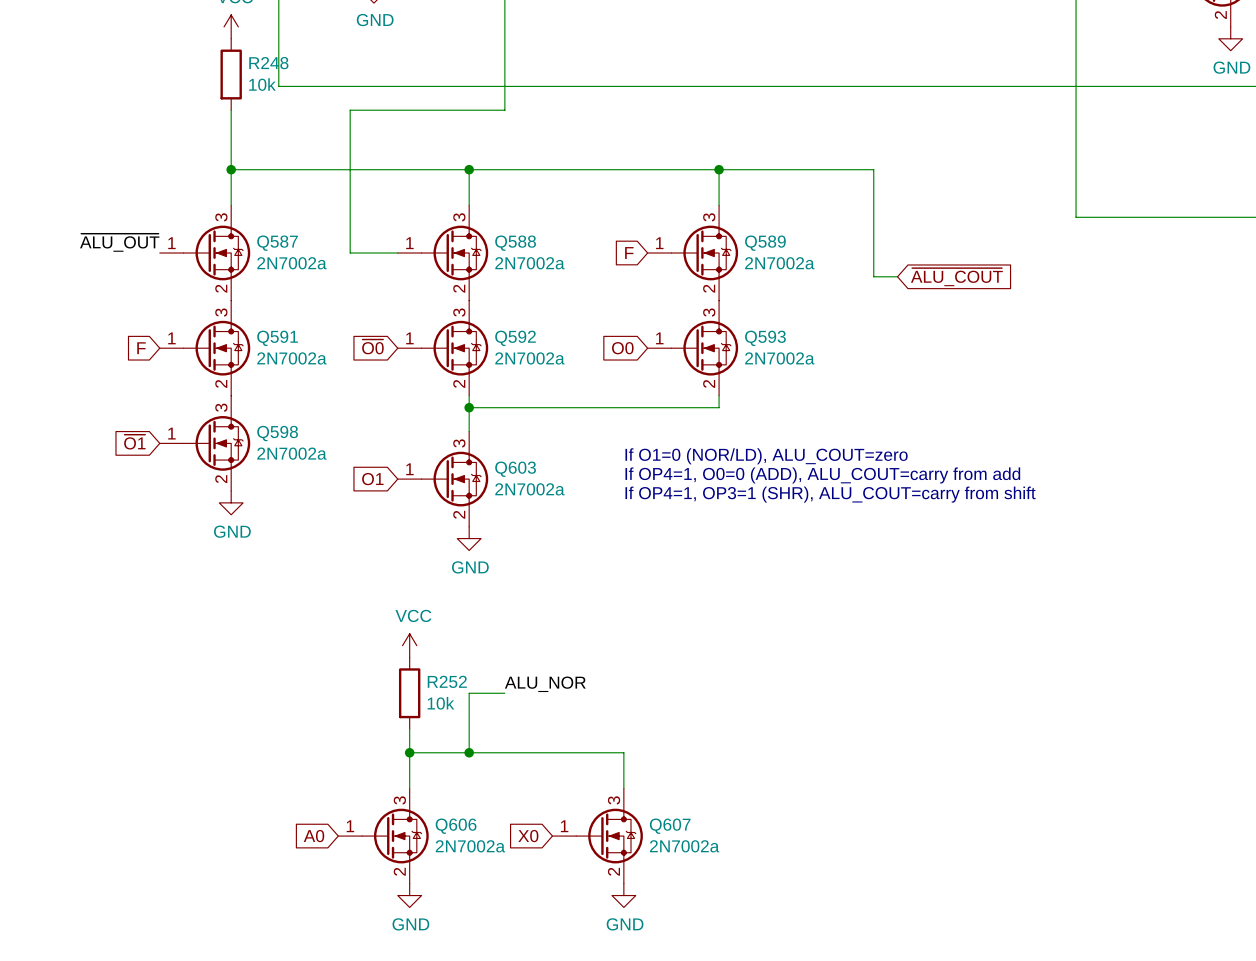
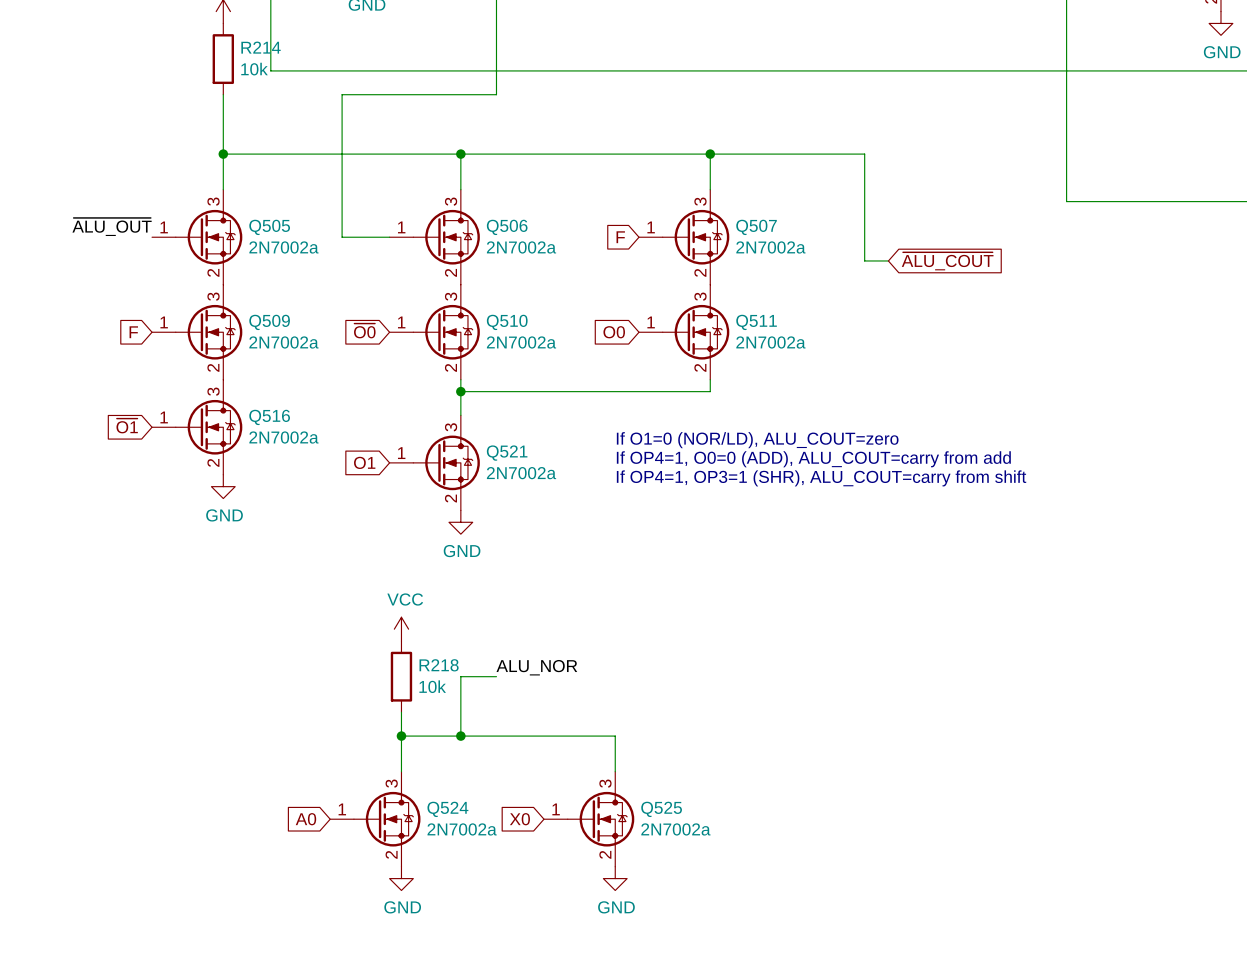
R248 name: R248 (268, 63) -> R214 (261, 47)
Q587 name: Q587 (277, 243) -> Q505 (269, 227)
Q588 name: Q588 (515, 243) -> Q506 (507, 227)
Q589 name: Q589 (765, 243) -> Q507 (756, 227)
Q591 name: Q591 (277, 338) -> Q509 (269, 322)
Q592 name: Q592 (515, 338) -> Q510 (507, 322)
Q593 name: Q593 (765, 338) -> Q511 (756, 322)
Q598 name: Q598 (277, 433) -> Q516 (269, 417)
Q603 name: Q603 (515, 469) -> Q521 (507, 453)
R252 name: R252 (447, 681) -> R218 (439, 665)
Q606 name: Q606 (456, 826) -> Q524 (447, 809)
Q607 name: Q607 (670, 826) -> Q525 (661, 809)

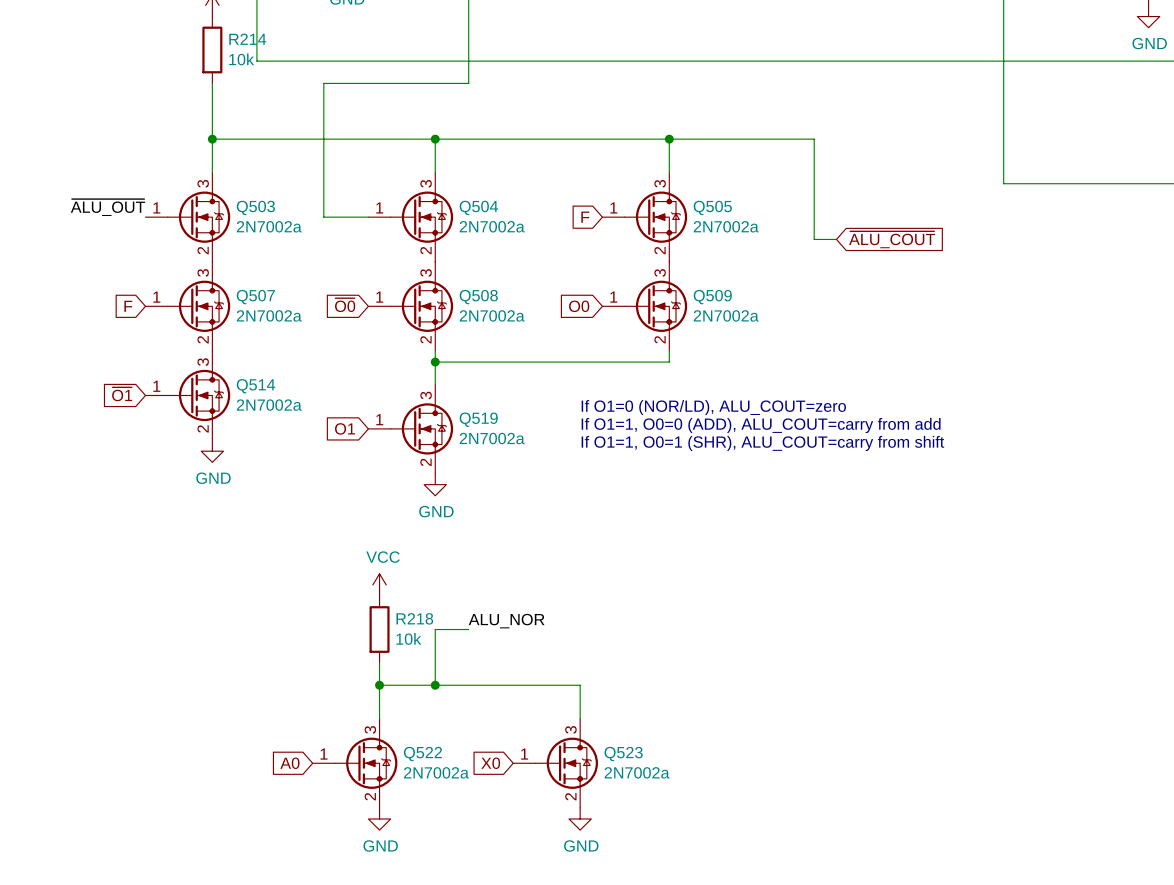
Q505 name: Q505 (269, 227) -> Q503 (255, 207)
Q506 name: Q506 (507, 227) -> Q504 (478, 207)
Q507 name: Q507 (756, 227) -> Q505 (712, 207)
Q509 name: Q509 (269, 322) -> Q507 (255, 297)
Q510 name: Q510 (507, 322) -> Q508 (478, 297)
Q511 name: Q511 (756, 322) -> Q509 (712, 297)
Q516 name: Q516 (269, 417) -> Q514 (255, 386)
Q521 name: Q521 (507, 453) -> Q519 (478, 419)
text: If OP4=1, O0=0 (ADD), ALU_COUT=carry from add (813, 459) -> If O1=1, O0=0 (ADD), ALU_COUT=carry from add (761, 425)
text: If OP4=1, OP3=1 (SHR), ALU_COUT=carry from shift (821, 478) -> If O1=1, O0=1 (SHR), ALU_COUT=carry from shift (762, 443)
Q524 name: Q524 (447, 809) -> Q522 (422, 754)
Q525 name: Q525 (661, 809) -> Q523 (623, 754)

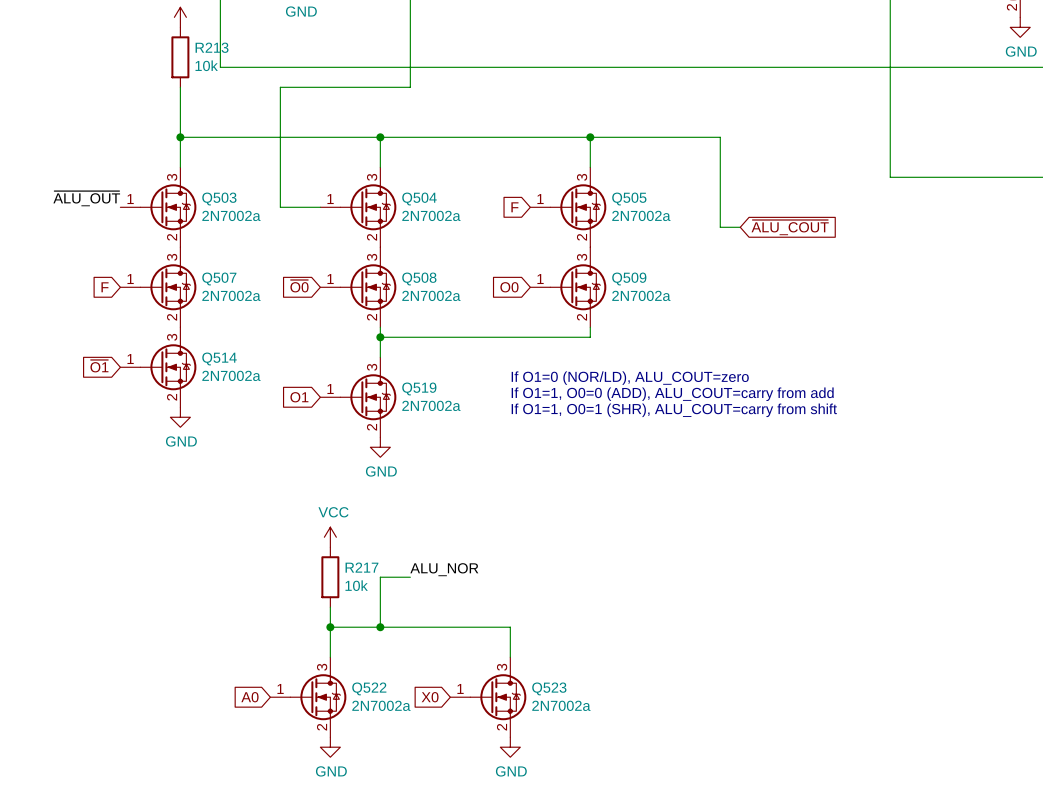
R214 name: R214 (247, 39) -> R213 (212, 47)
R218 name: R218 (414, 618) -> R217 (361, 567)

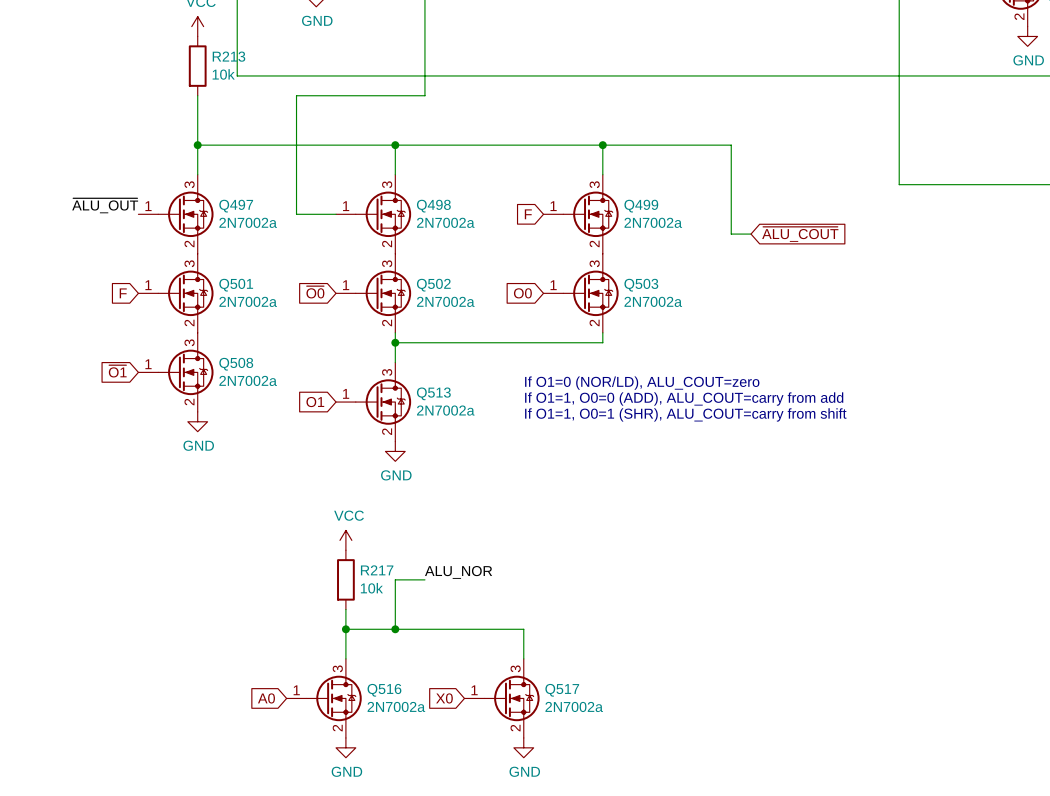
Q503 name: Q503 (219, 199) -> Q497 (236, 206)
Q504 name: Q504 (419, 199) -> Q498 (433, 206)
Q505 name: Q505 (629, 199) -> Q499 (641, 206)
Q507 name: Q507 (219, 279) -> Q501 (236, 285)
Q508 name: Q508 (419, 279) -> Q502 (433, 285)
Q509 name: Q509 (629, 279) -> Q503 (641, 285)
Q514 name: Q514 (219, 358) -> Q508 (236, 364)
Q519 name: Q519 (419, 388) -> Q513 (433, 393)
Q522 name: Q522 (369, 688) -> Q516 (384, 690)
Q523 name: Q523 (549, 688) -> Q517 (562, 690)

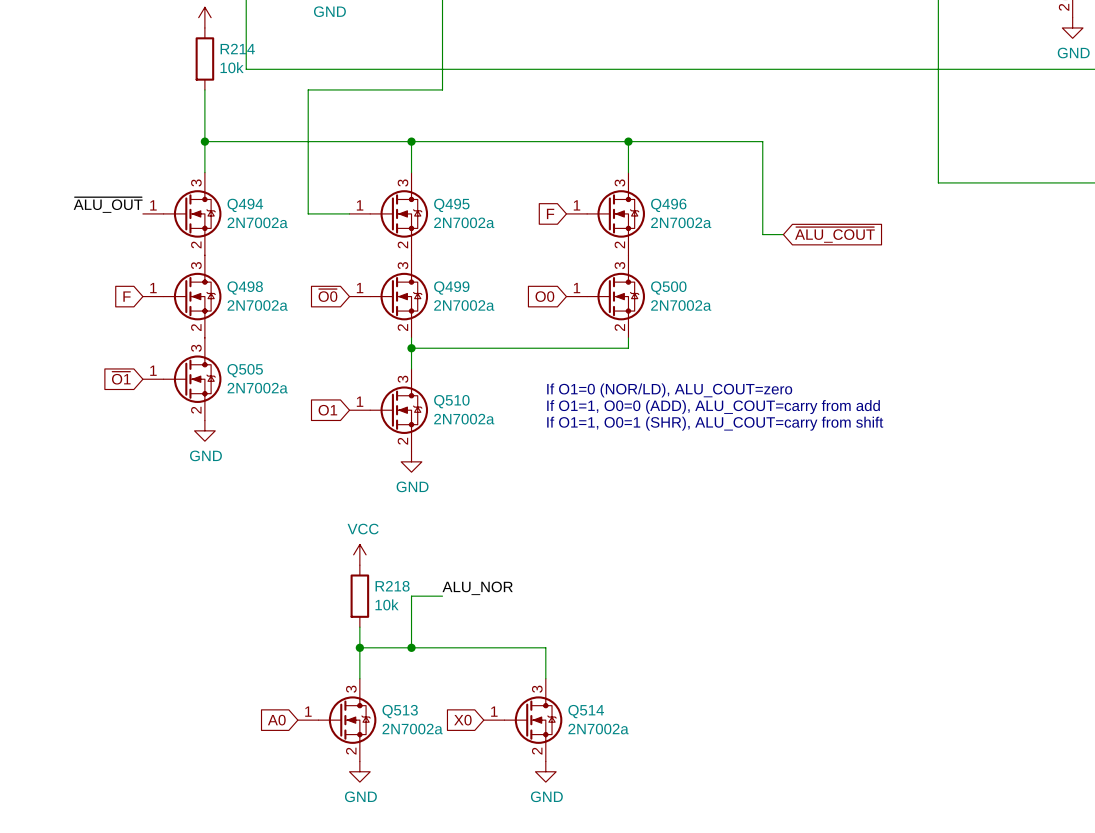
R213 name: R213 (228, 56) -> R214 (237, 49)
Q497 name: Q497 (236, 206) -> Q494 (245, 205)
Q498 name: Q498 (433, 206) -> Q495 (451, 205)
Q499 name: Q499 (641, 206) -> Q496 (668, 205)
Q501 name: Q501 (236, 285) -> Q498 (245, 288)
Q502 name: Q502 (433, 285) -> Q499 (451, 288)
Q503 name: Q503 (641, 285) -> Q500 (668, 288)
Q508 name: Q508 (236, 364) -> Q505 (245, 370)
Q513 name: Q513 (433, 393) -> Q510 (451, 401)
R217 name: R217 (377, 570) -> R218 (392, 586)
Q516 name: Q516 (384, 690) -> Q513 (400, 711)
Q517 name: Q517 (562, 690) -> Q514 (586, 711)

